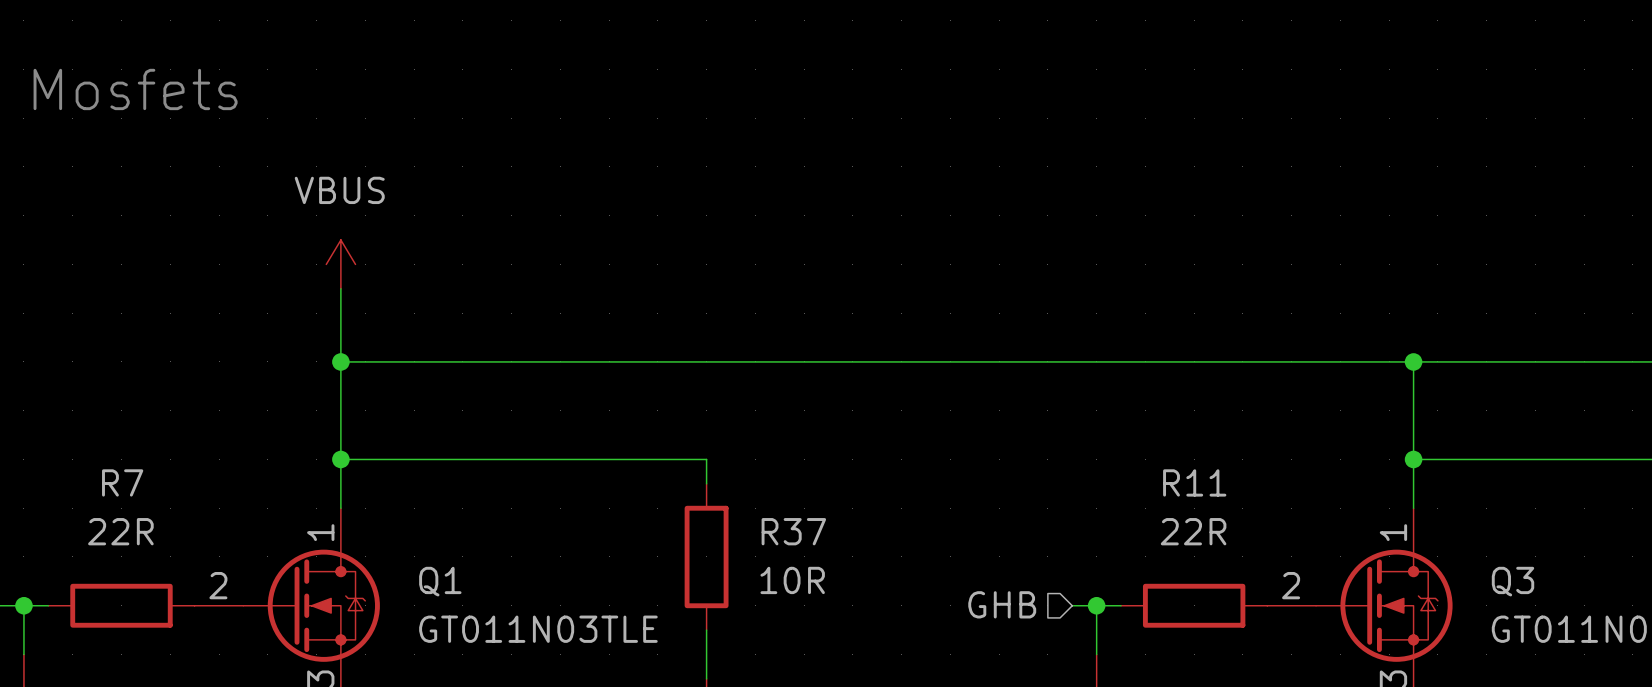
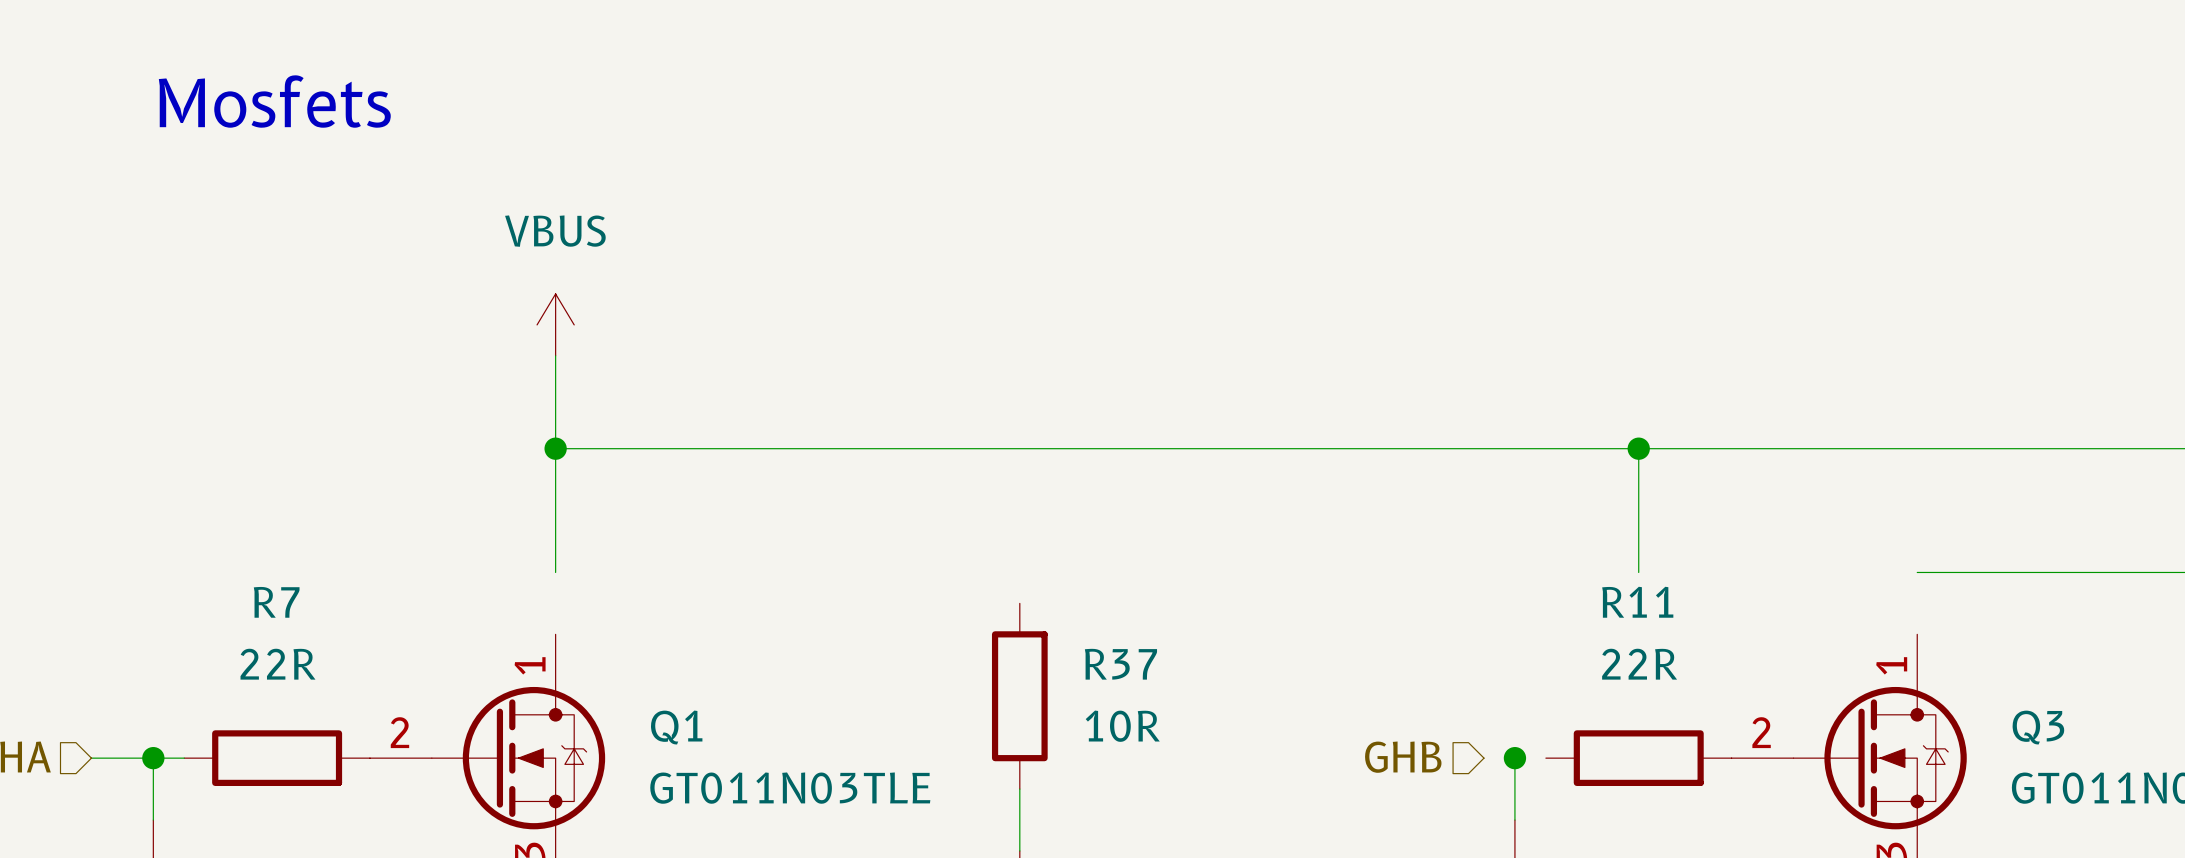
wire: none -> (1638, 448) (1638, 572)
junction: none -> (1638, 448)
wire: (1413, 361) (1413, 508) -> none
junction: (1413, 361) -> none
junction: (340, 459) -> none
junction: (1413, 459) -> none
wire: (706, 483) (706, 459) (340, 459) (340, 508) -> none
wire: (1072, 605) (1121, 605) -> none

